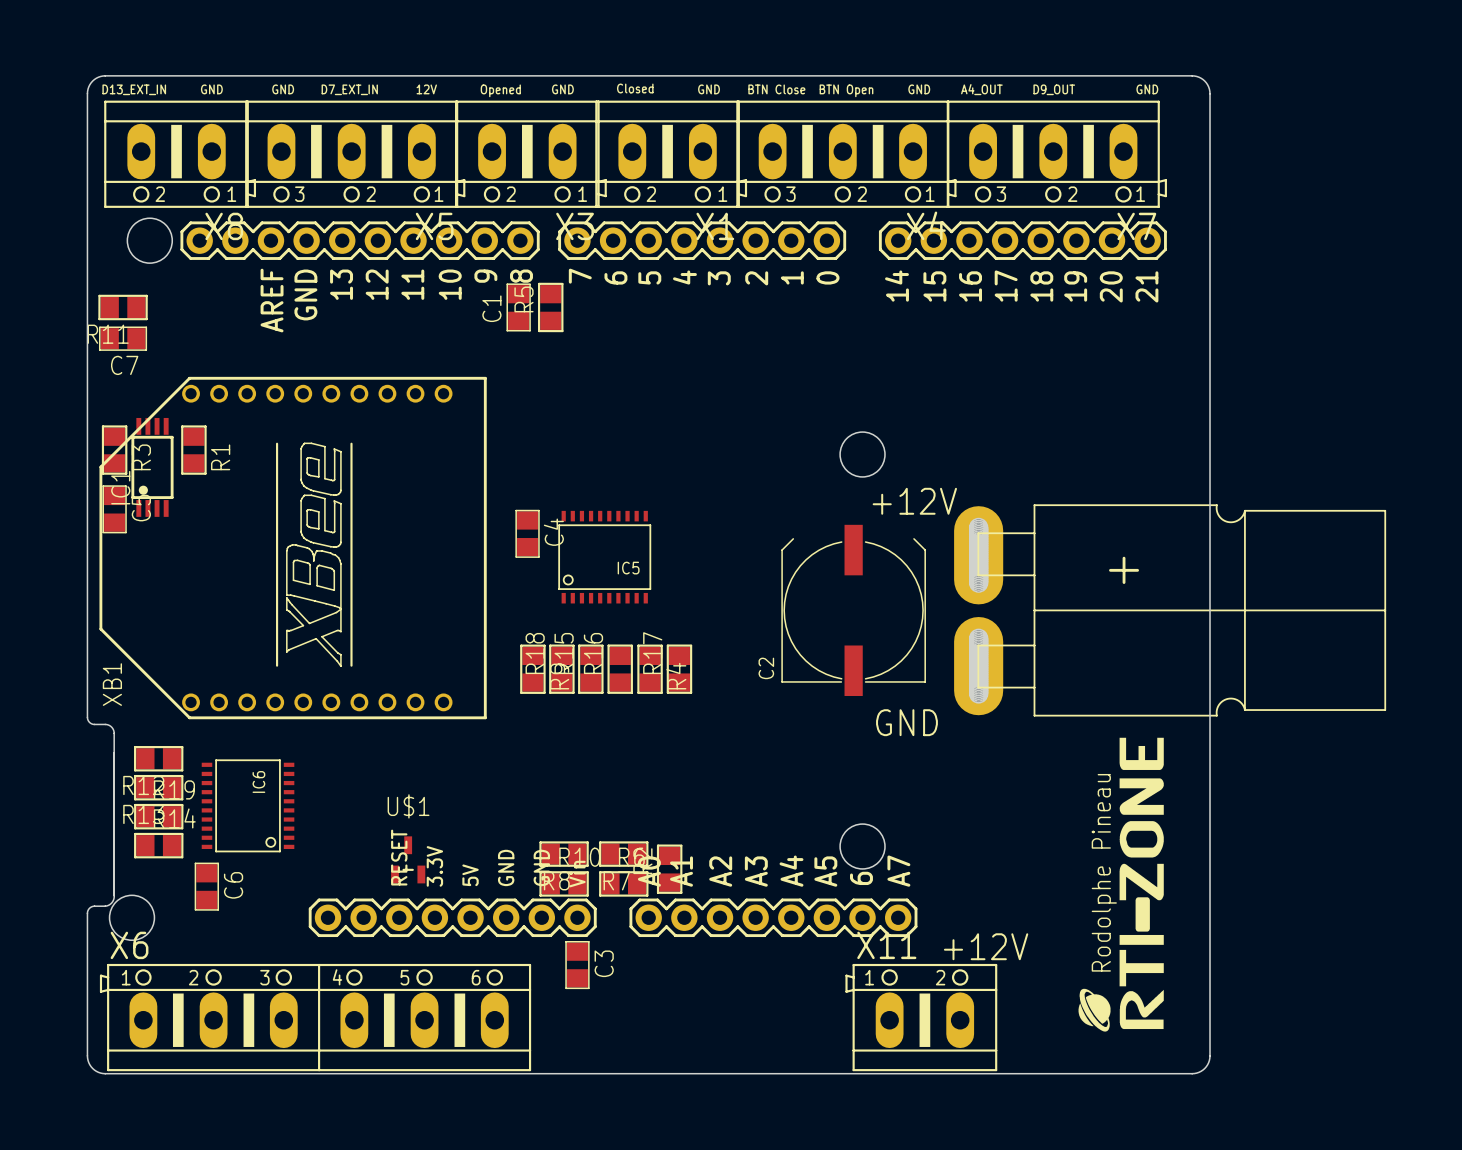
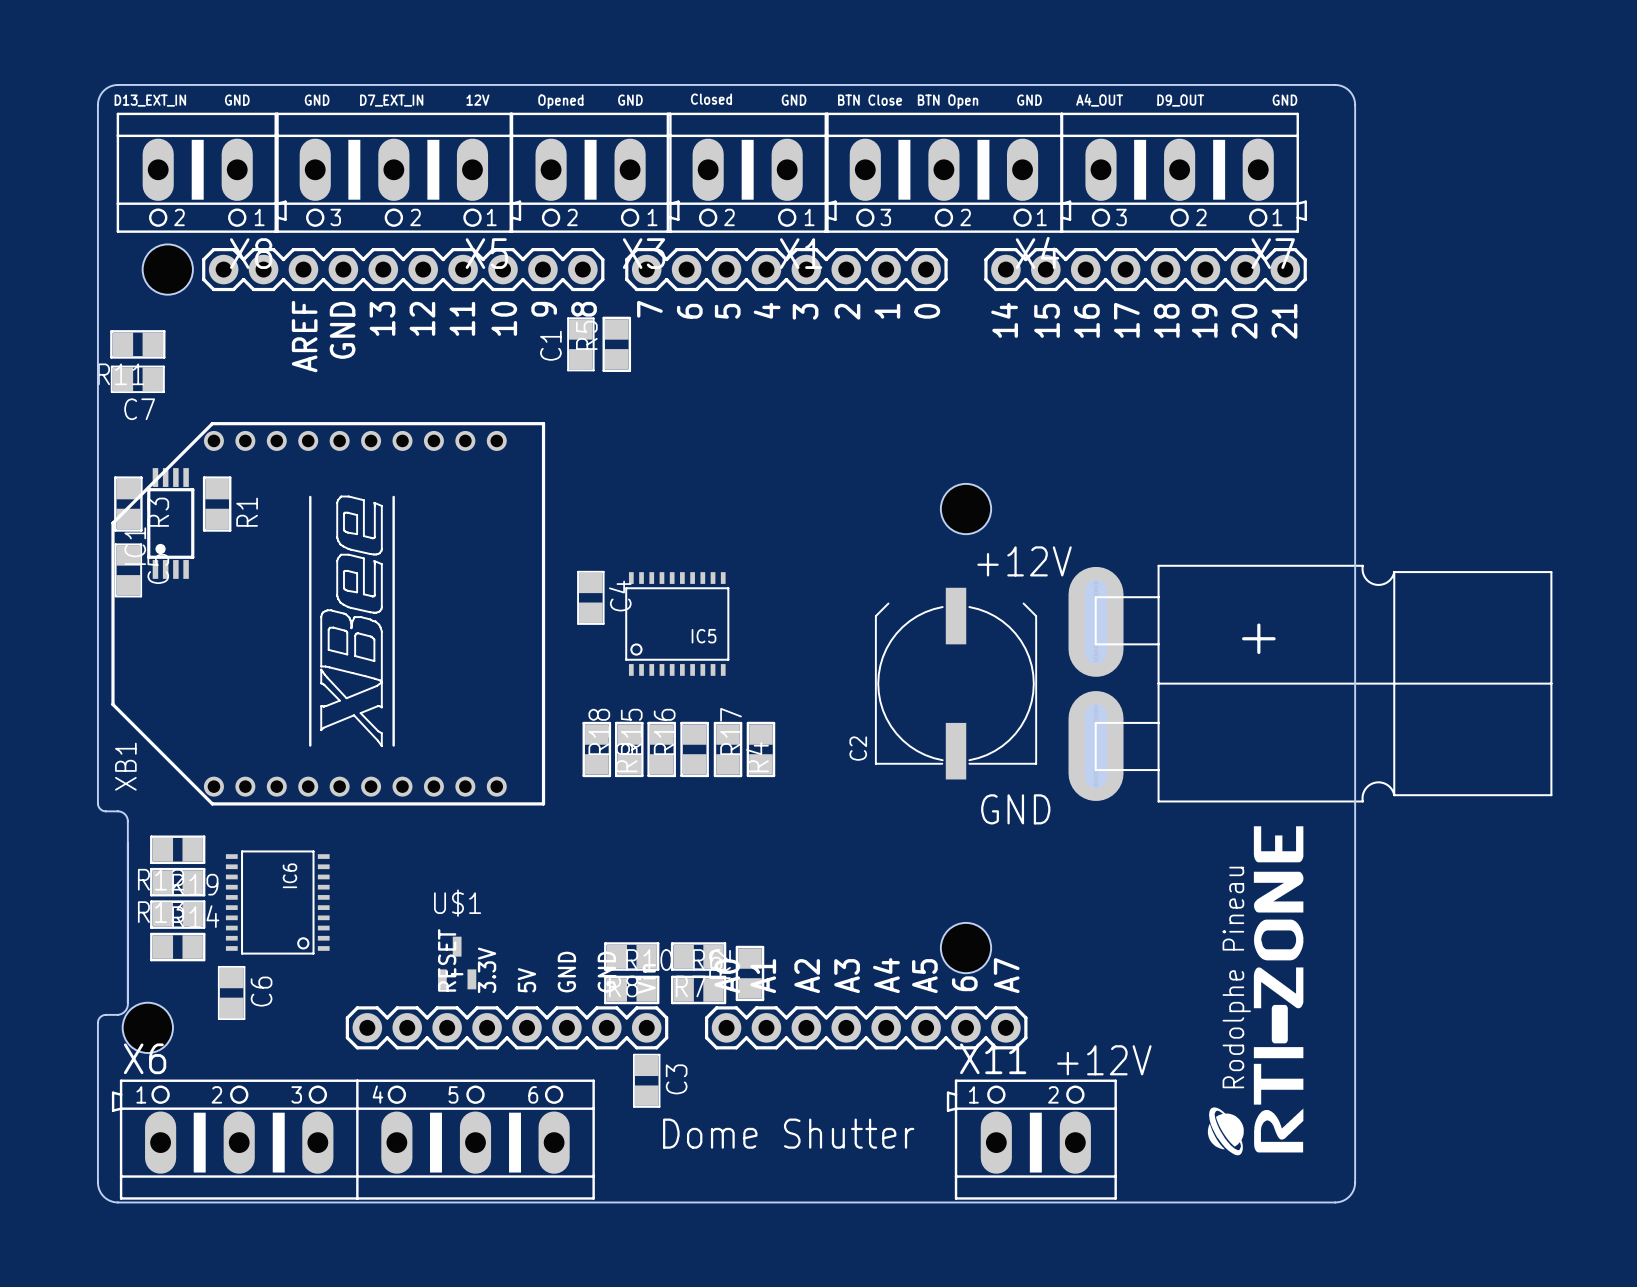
text: none -> Dome Shutter (788, 1133)

